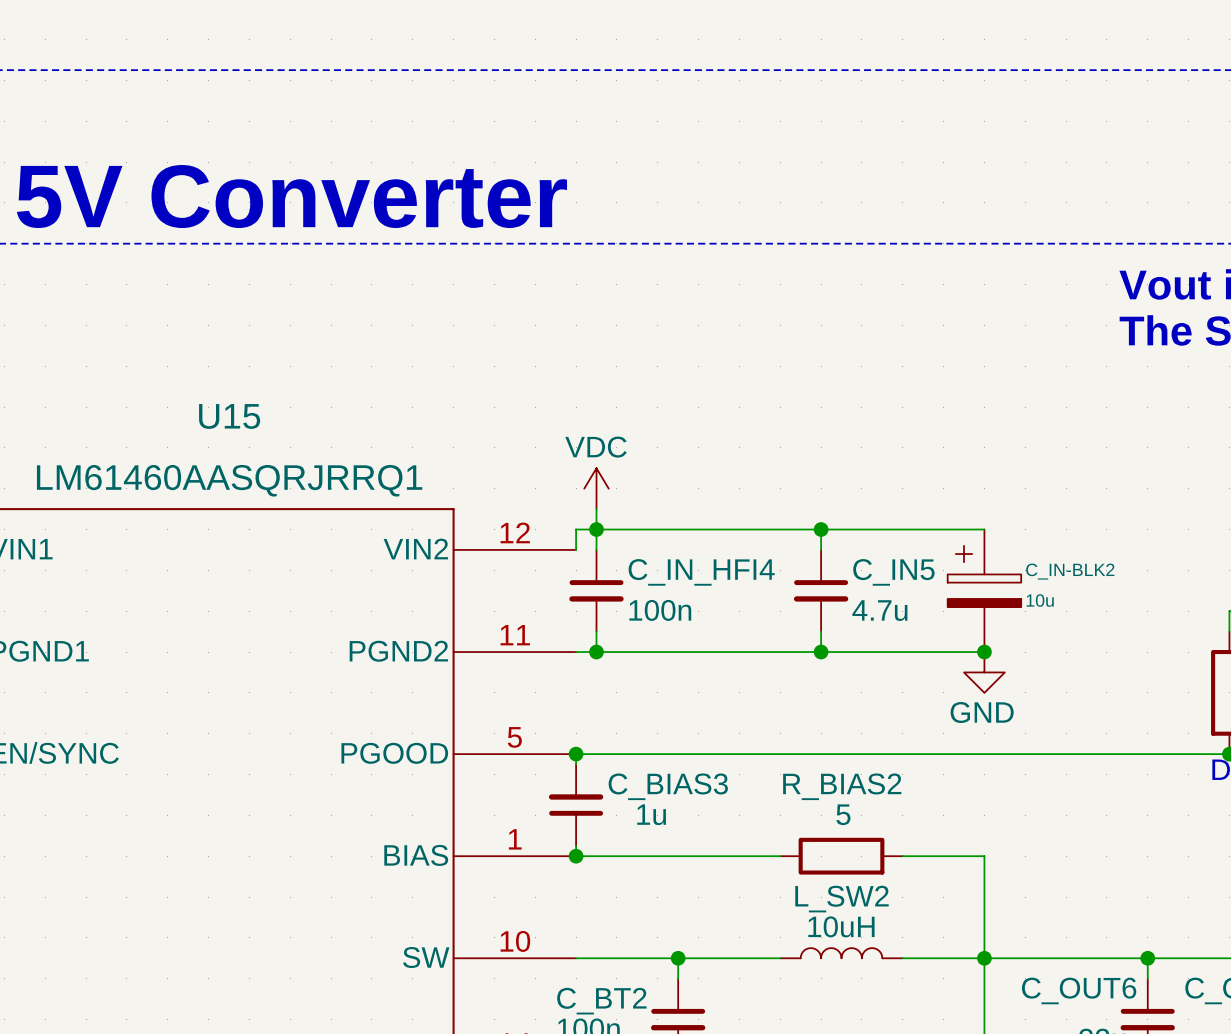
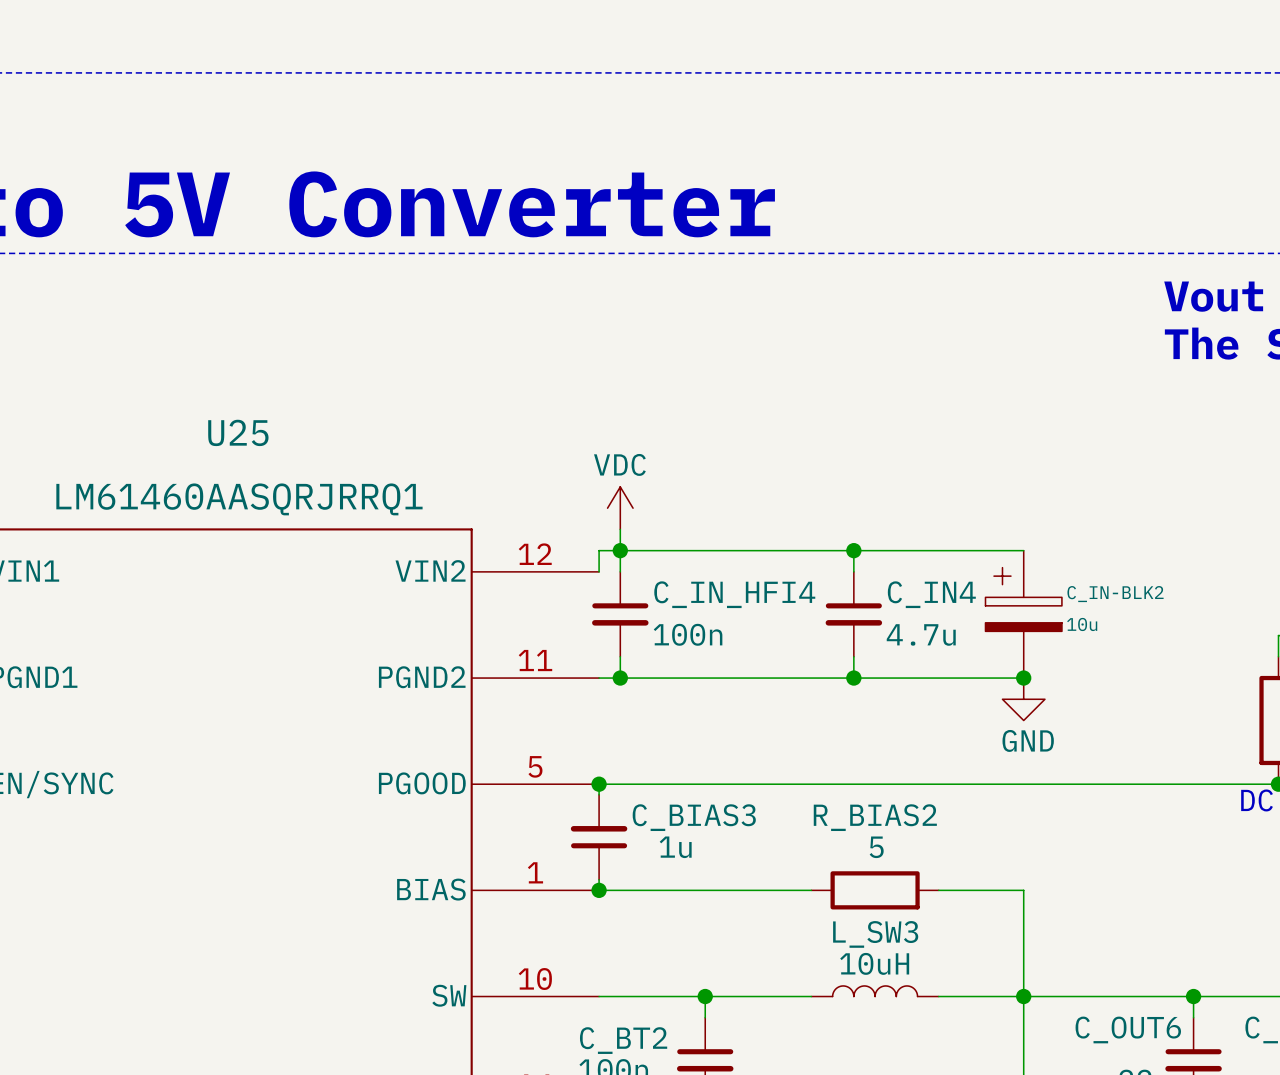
U15 name: U15 (229, 416) -> U25 (238, 432)
C_IN5 name: C_IN5 (893, 572) -> C_IN4 (931, 594)
L_SW2 name: L_SW2 (841, 899) -> L_SW3 (875, 934)

